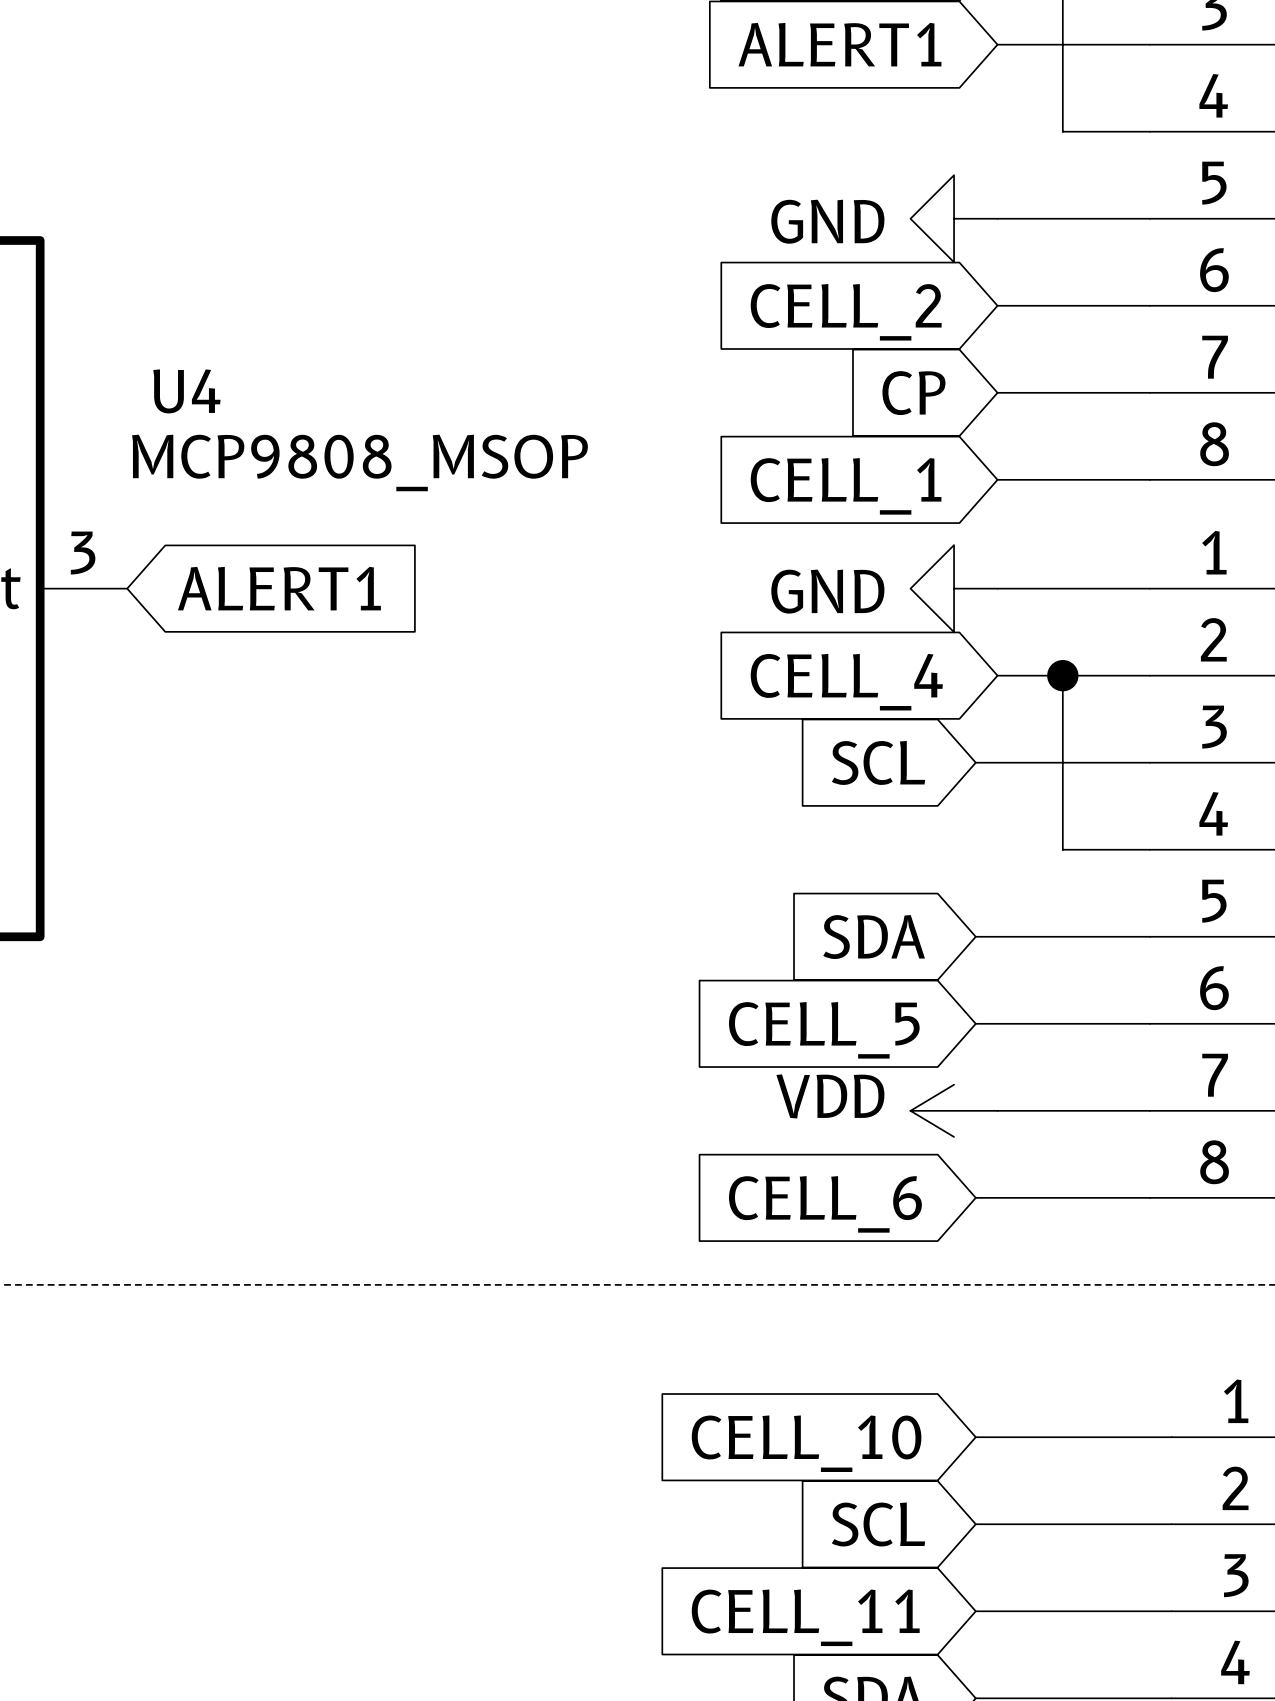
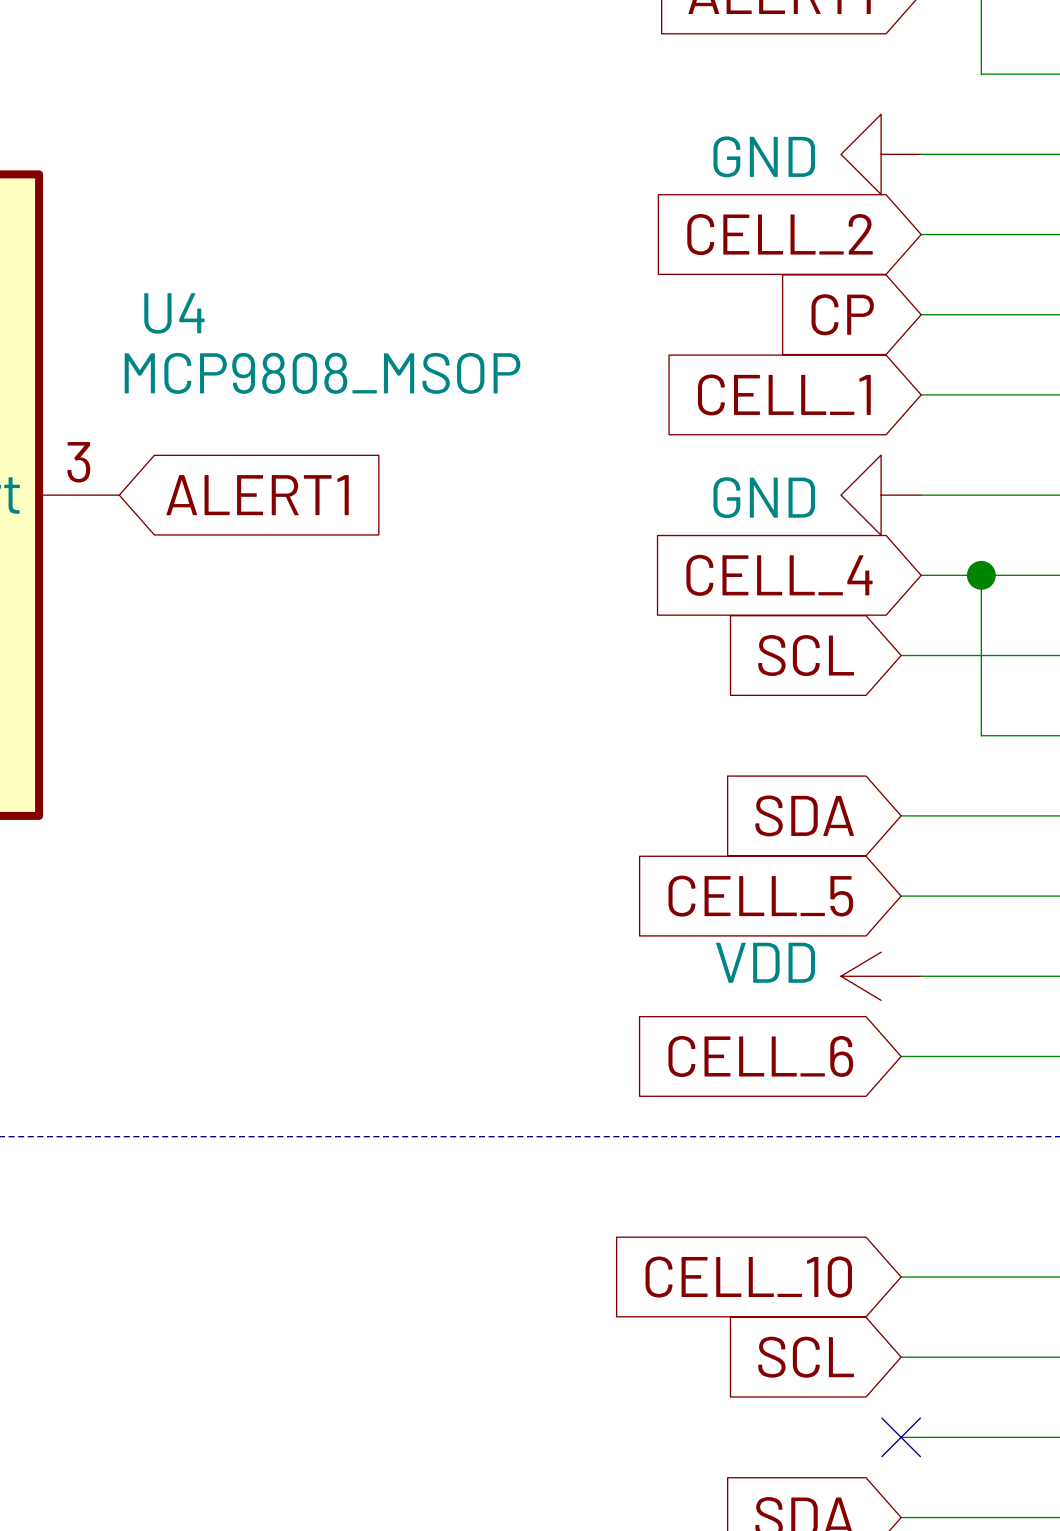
no-connect mark: none -> (901, 1437)
global label: CELL_11 (805, 1617) -> none

